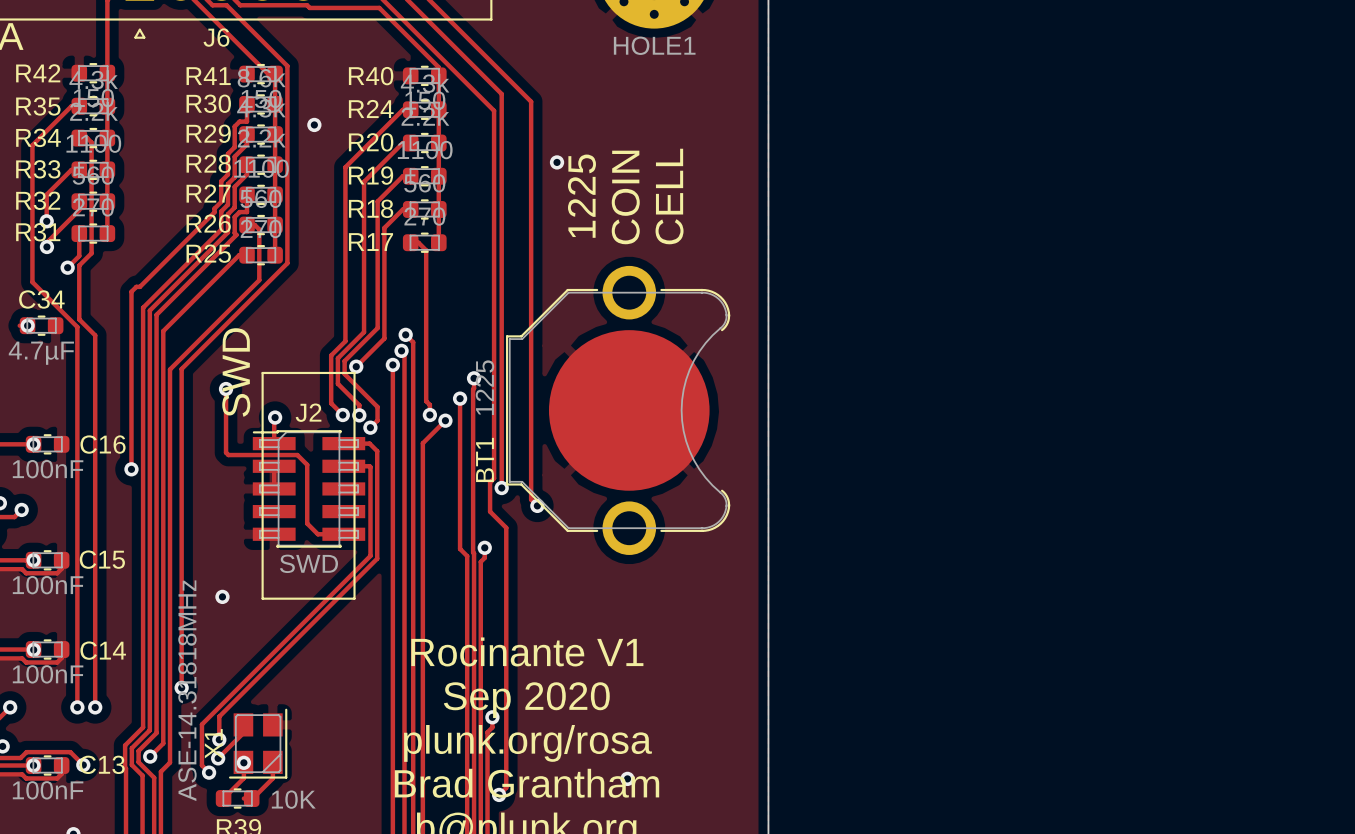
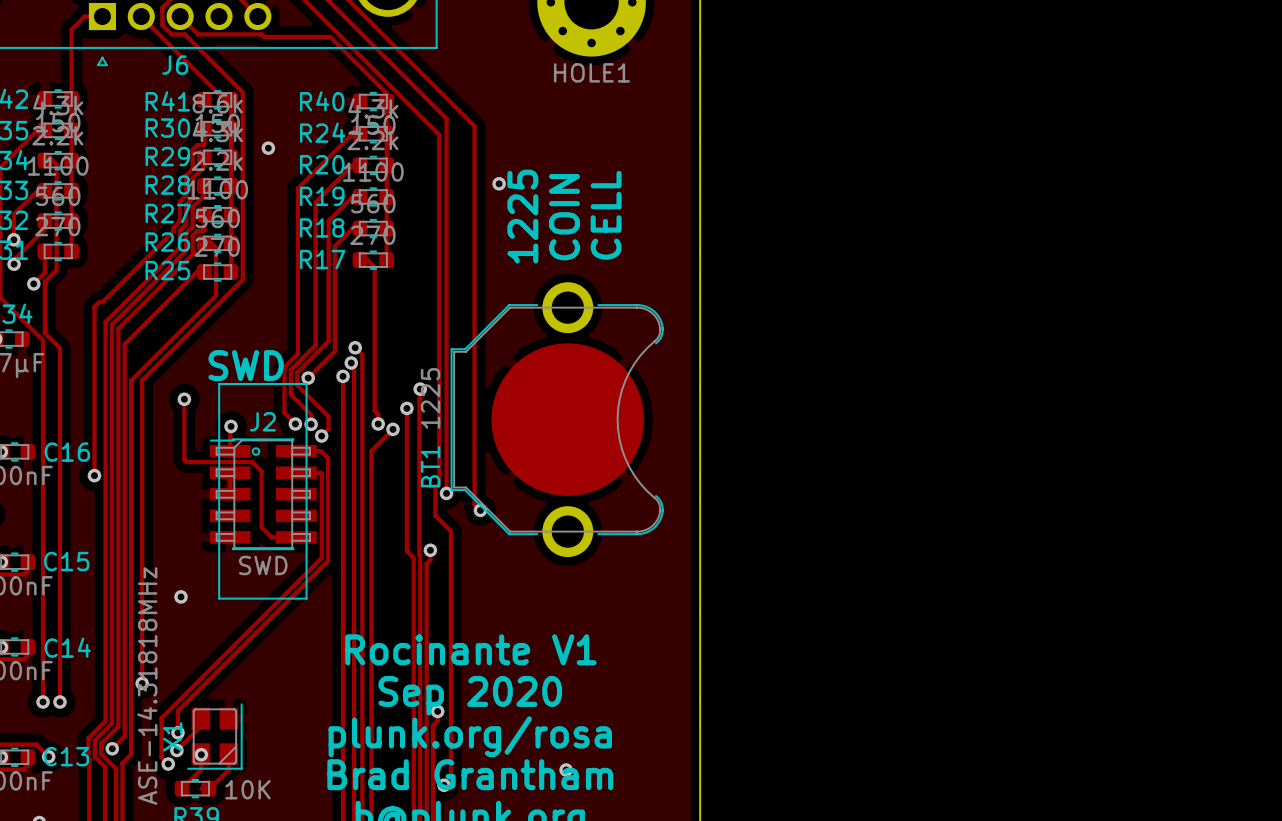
text rotation: 0° (236, 372) -> 90° clockwise (246, 365)
drawing: none -> [251, 447, 261, 456]

